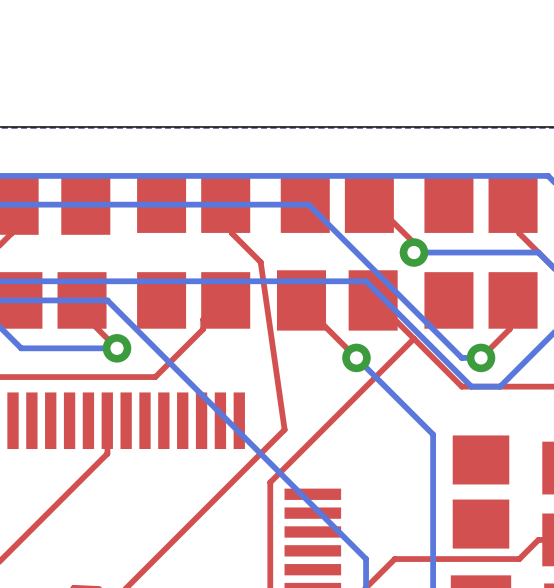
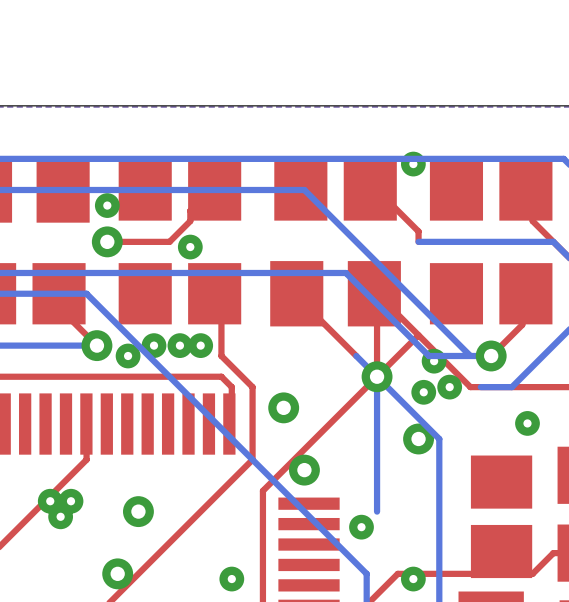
via: none -> (413, 164)
top track: (225, 204) (231, 204) (231, 233) (260, 262) (284, 429) (260, 453) -> (214, 293) (221, 293) (221, 355) (252, 387) (252, 459)
top track: none -> (214, 189) (211, 189) (190, 210) (190, 221) (169, 241) (107, 241)
via: none -> (107, 205)
via: none -> (107, 241)
via: (413, 252) -> none
via: none -> (190, 247)
bottom track: (346, 281) (366, 281) (471, 386) -> (345, 272) (428, 355) (470, 355)
top track: (225, 300) (222, 300) (203, 319) (203, 329) (155, 377) -> (229, 424) (231, 418) (231, 387) (221, 376) (138, 376)
top track: none -> (377, 293) (377, 376)
via: none -> (154, 345)
via: none -> (179, 345)
via: none -> (200, 345)
via: none -> (128, 355)
via position: (356, 357) -> (377, 376)
via: none -> (434, 361)
bottom track: none -> (377, 376) (377, 511)
via: none -> (449, 387)
via: none -> (423, 392)
via: none -> (283, 407)
via: none -> (527, 423)
via: none -> (418, 438)
via: none -> (304, 470)
via: none -> (50, 501)
via: none -> (71, 501)
part position: (481, 492) -> (501, 516)
via: none -> (138, 511)
via: none -> (60, 516)
via: none -> (361, 527)
via: none -> (117, 573)
via: none -> (231, 579)
via: none -> (413, 579)

